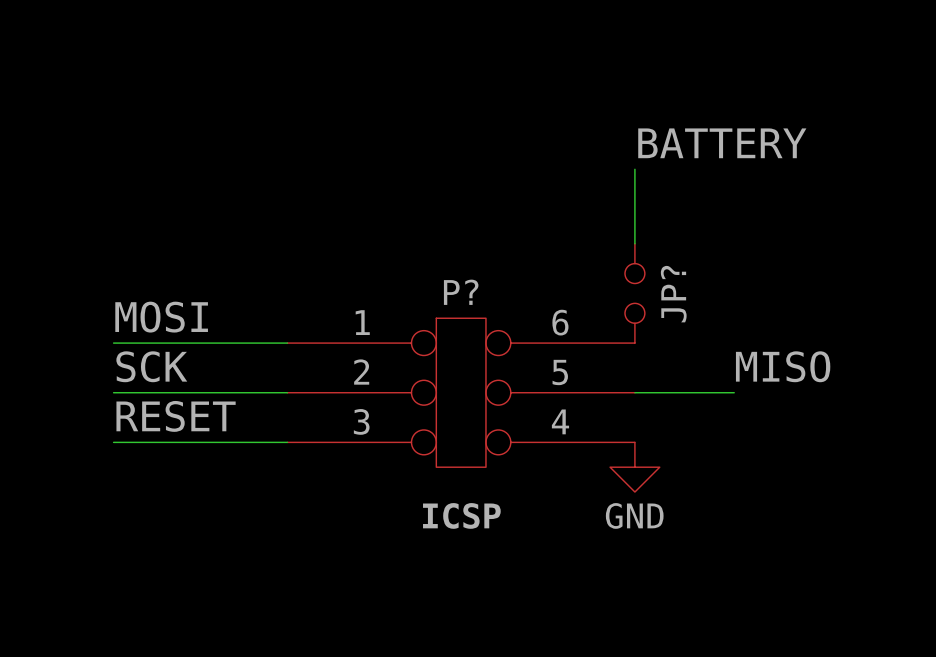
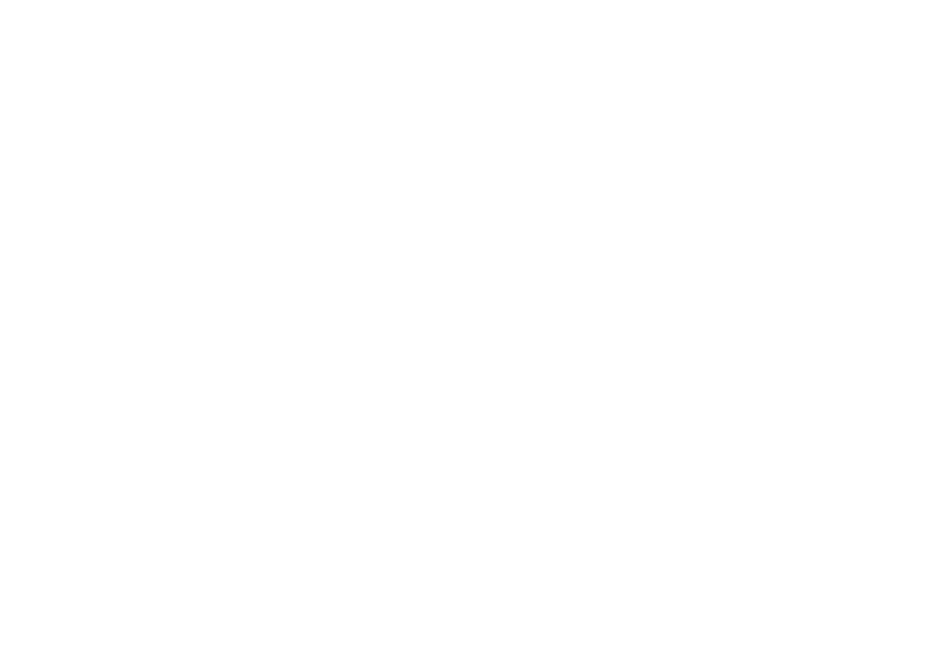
label: BATTERY (722, 143) -> none
wire: (634, 169) (634, 243) -> none
JP?: (634, 293) -> none
label: MOSI (161, 317) -> none
wire: (113, 343) (287, 343) -> none
label: SCK (151, 366) -> none
label: MISO (783, 366) -> none
wire: (113, 392) (287, 392) -> none
P?: ICSP (461, 392) -> none
wire: (634, 392) (734, 392) -> none
label: RESET (176, 416) -> none
wire: (113, 442) (287, 442) -> none
power symbol: GND (634, 467) -> none

